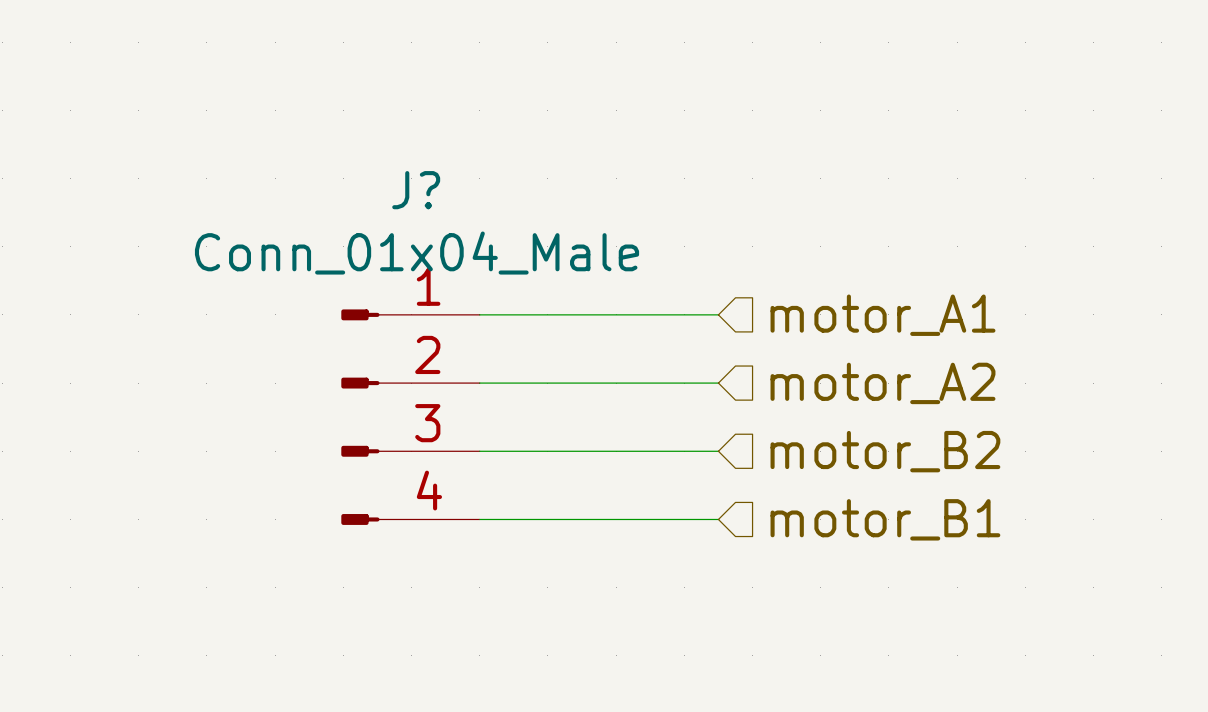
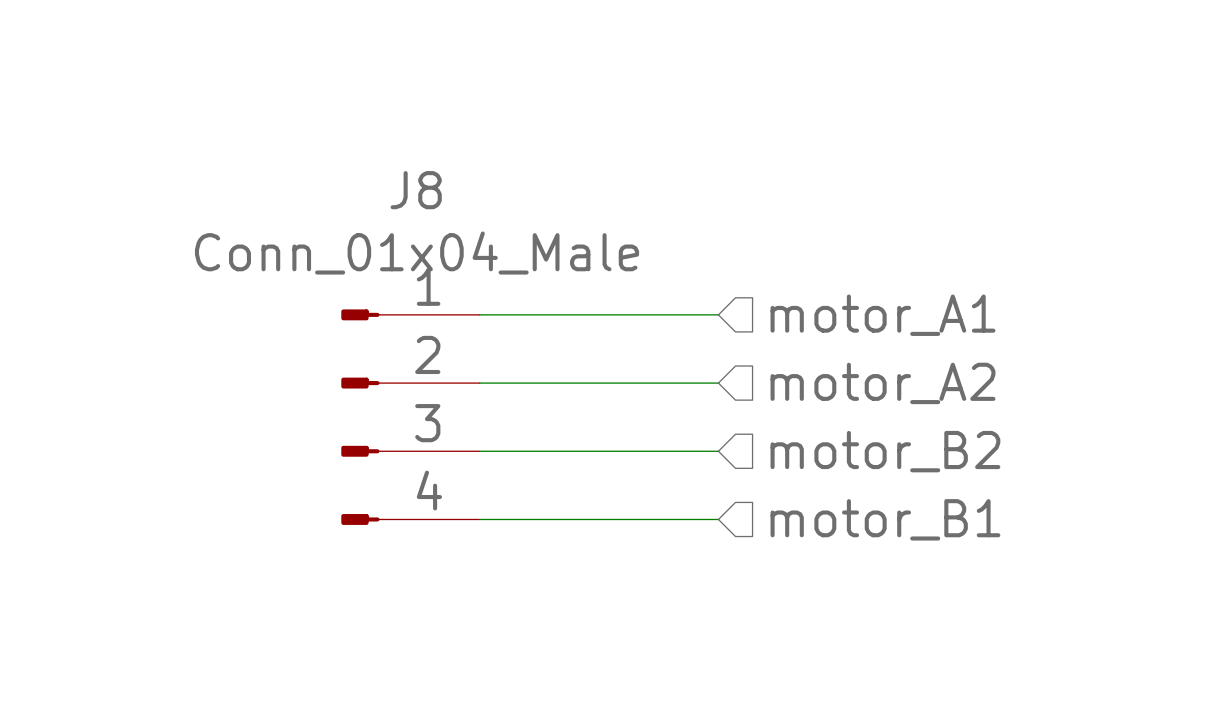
J? name: J? (416, 190) -> J8 (416, 190)

